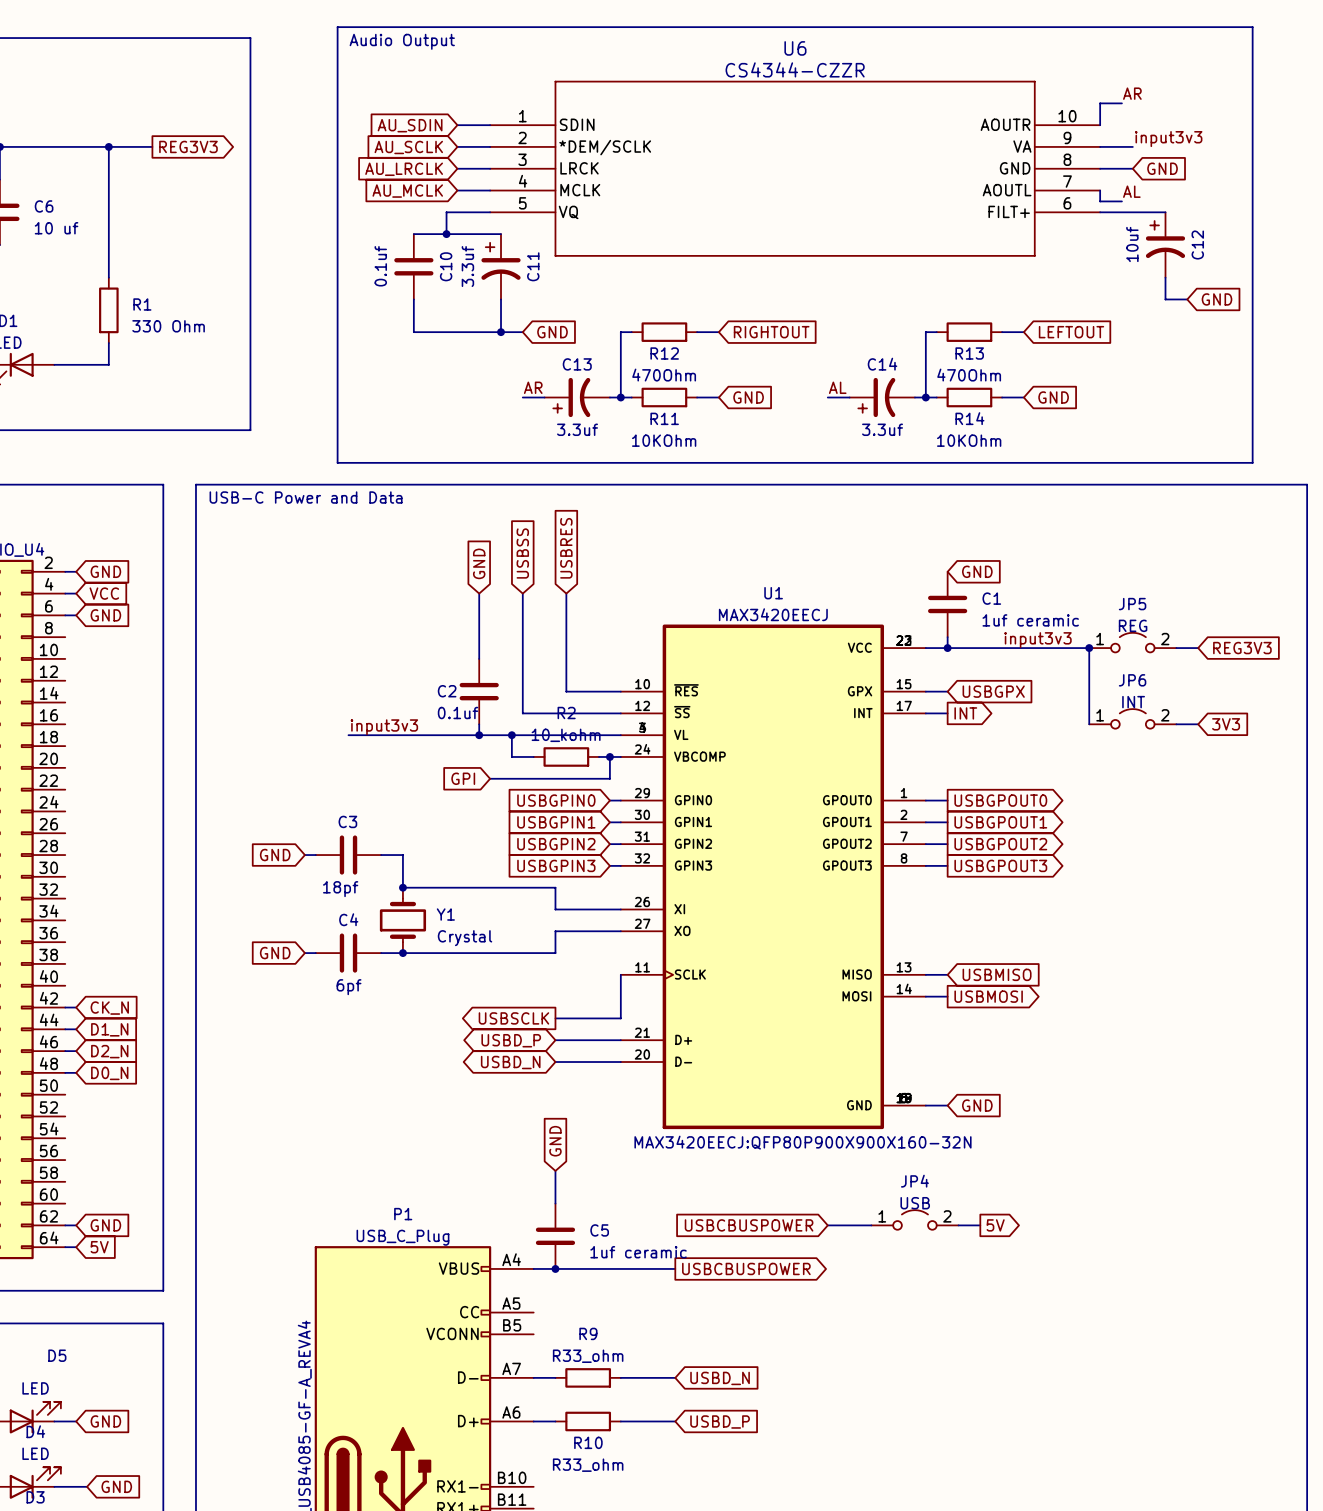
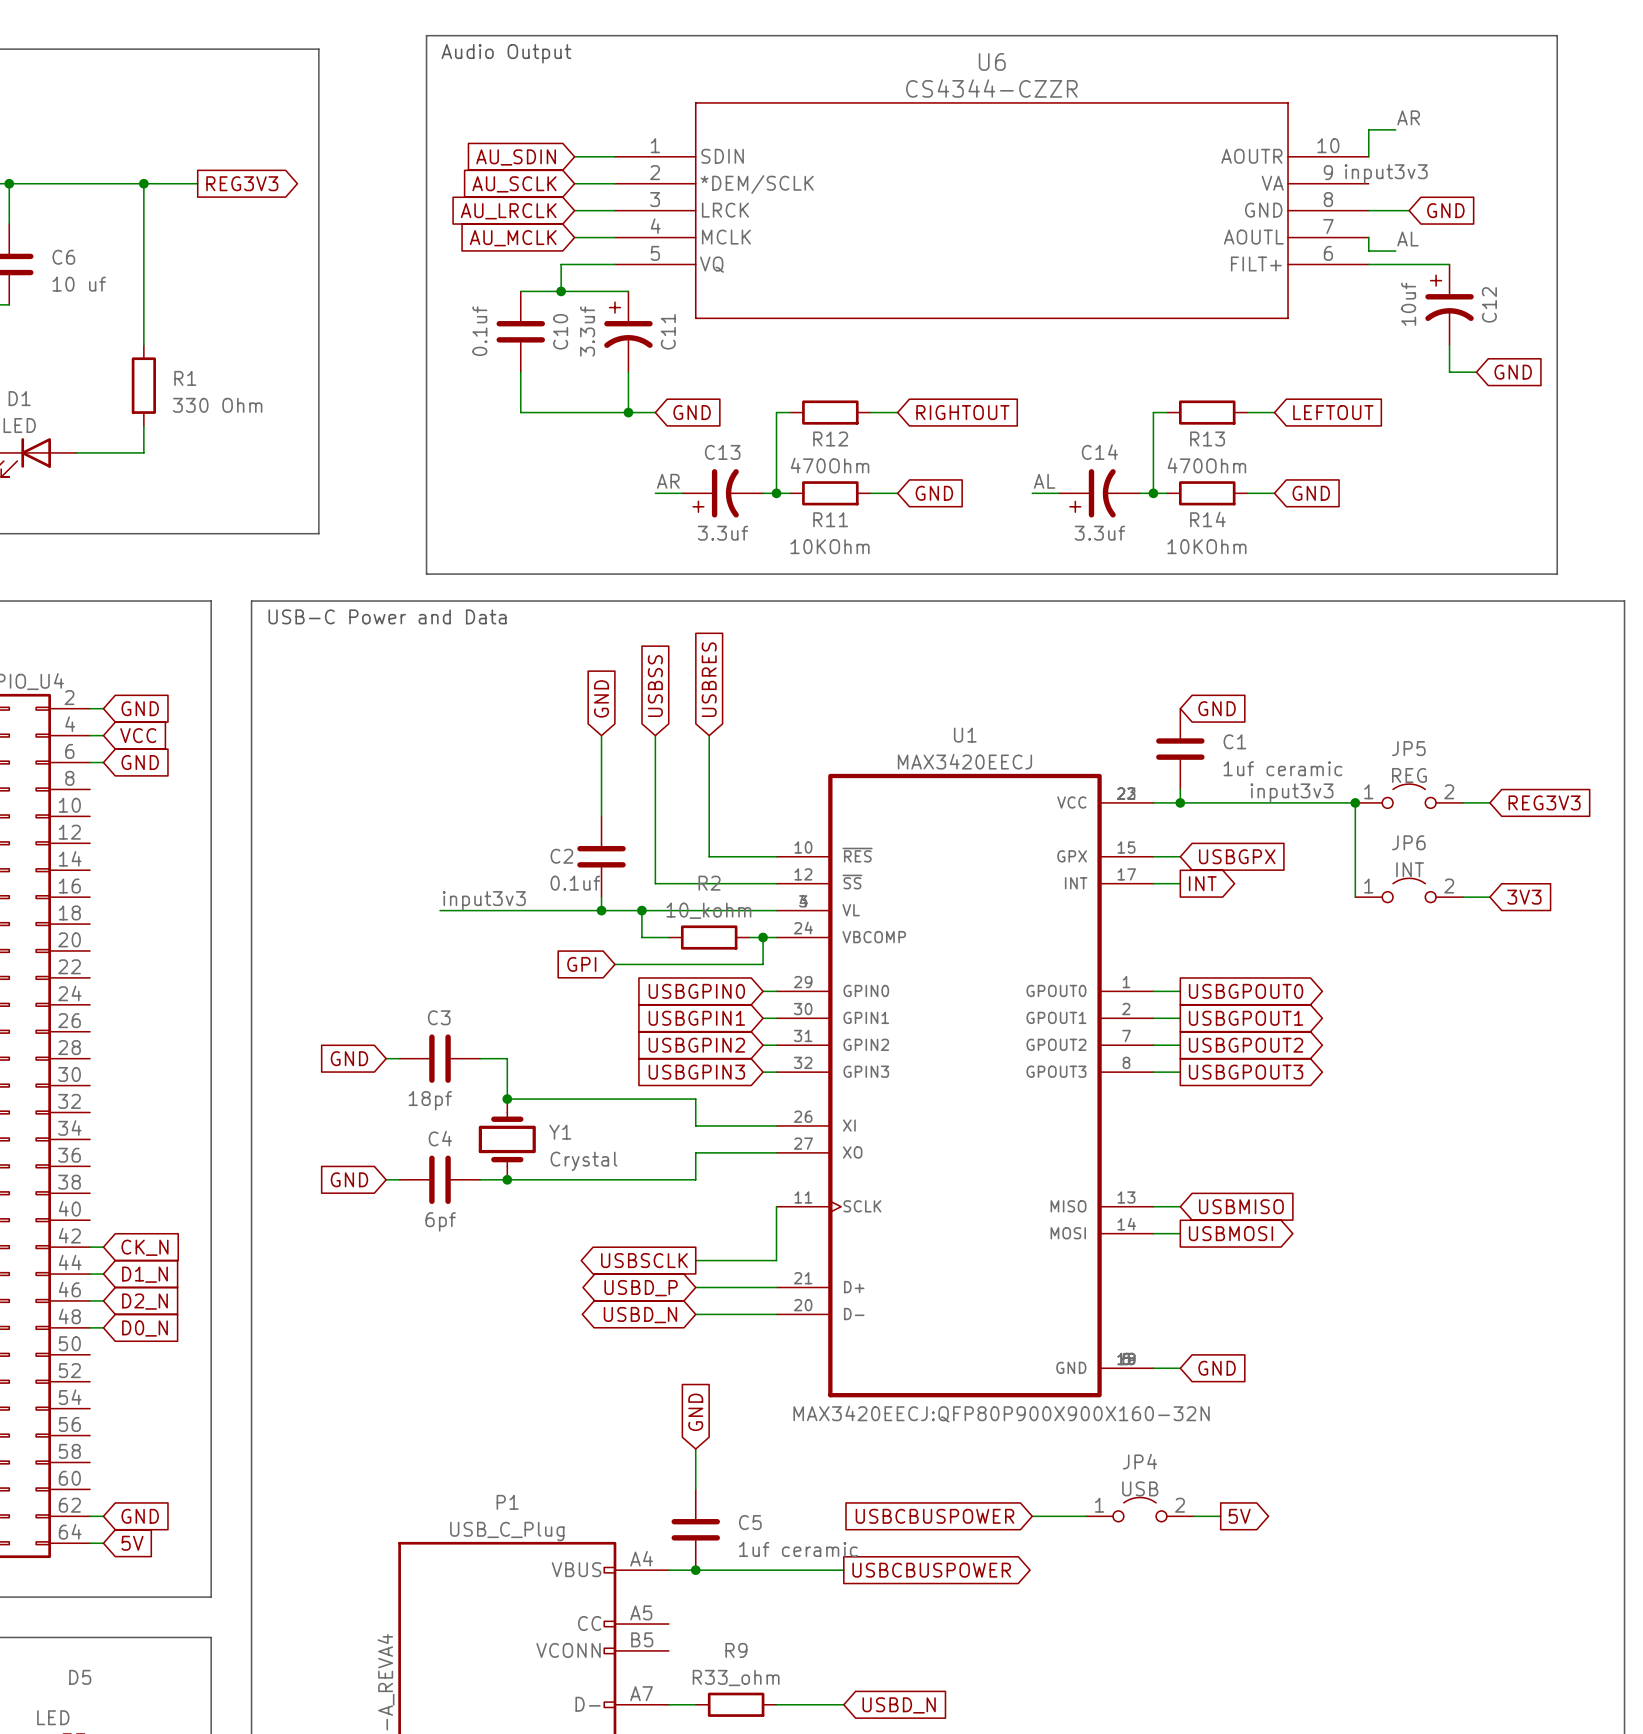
label position: input3v3 (1168, 139) -> input3v3 (1386, 173)
wire: (1100, 146) (1132, 146) -> none

